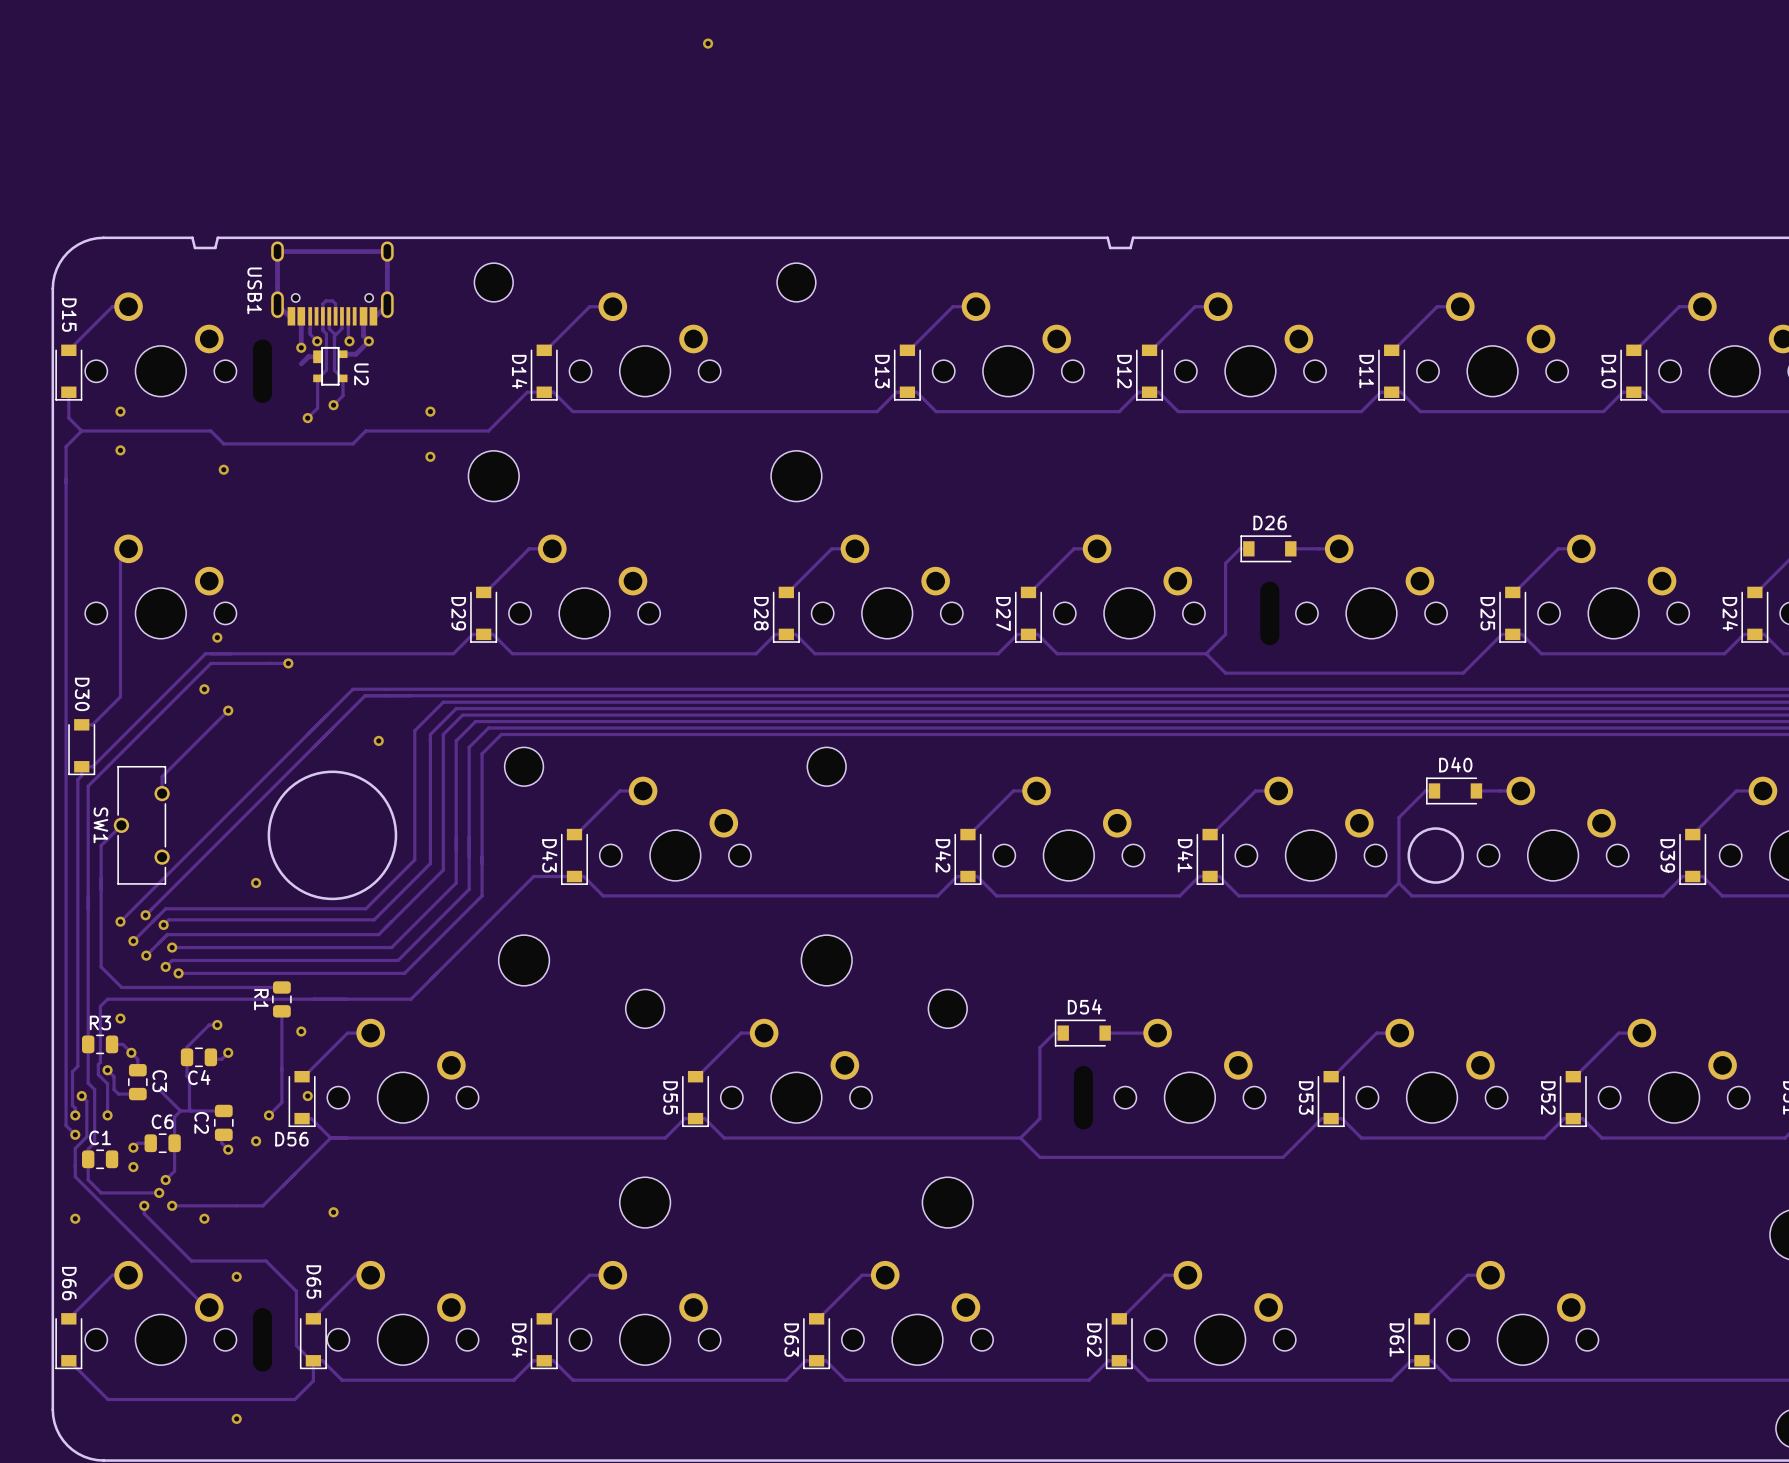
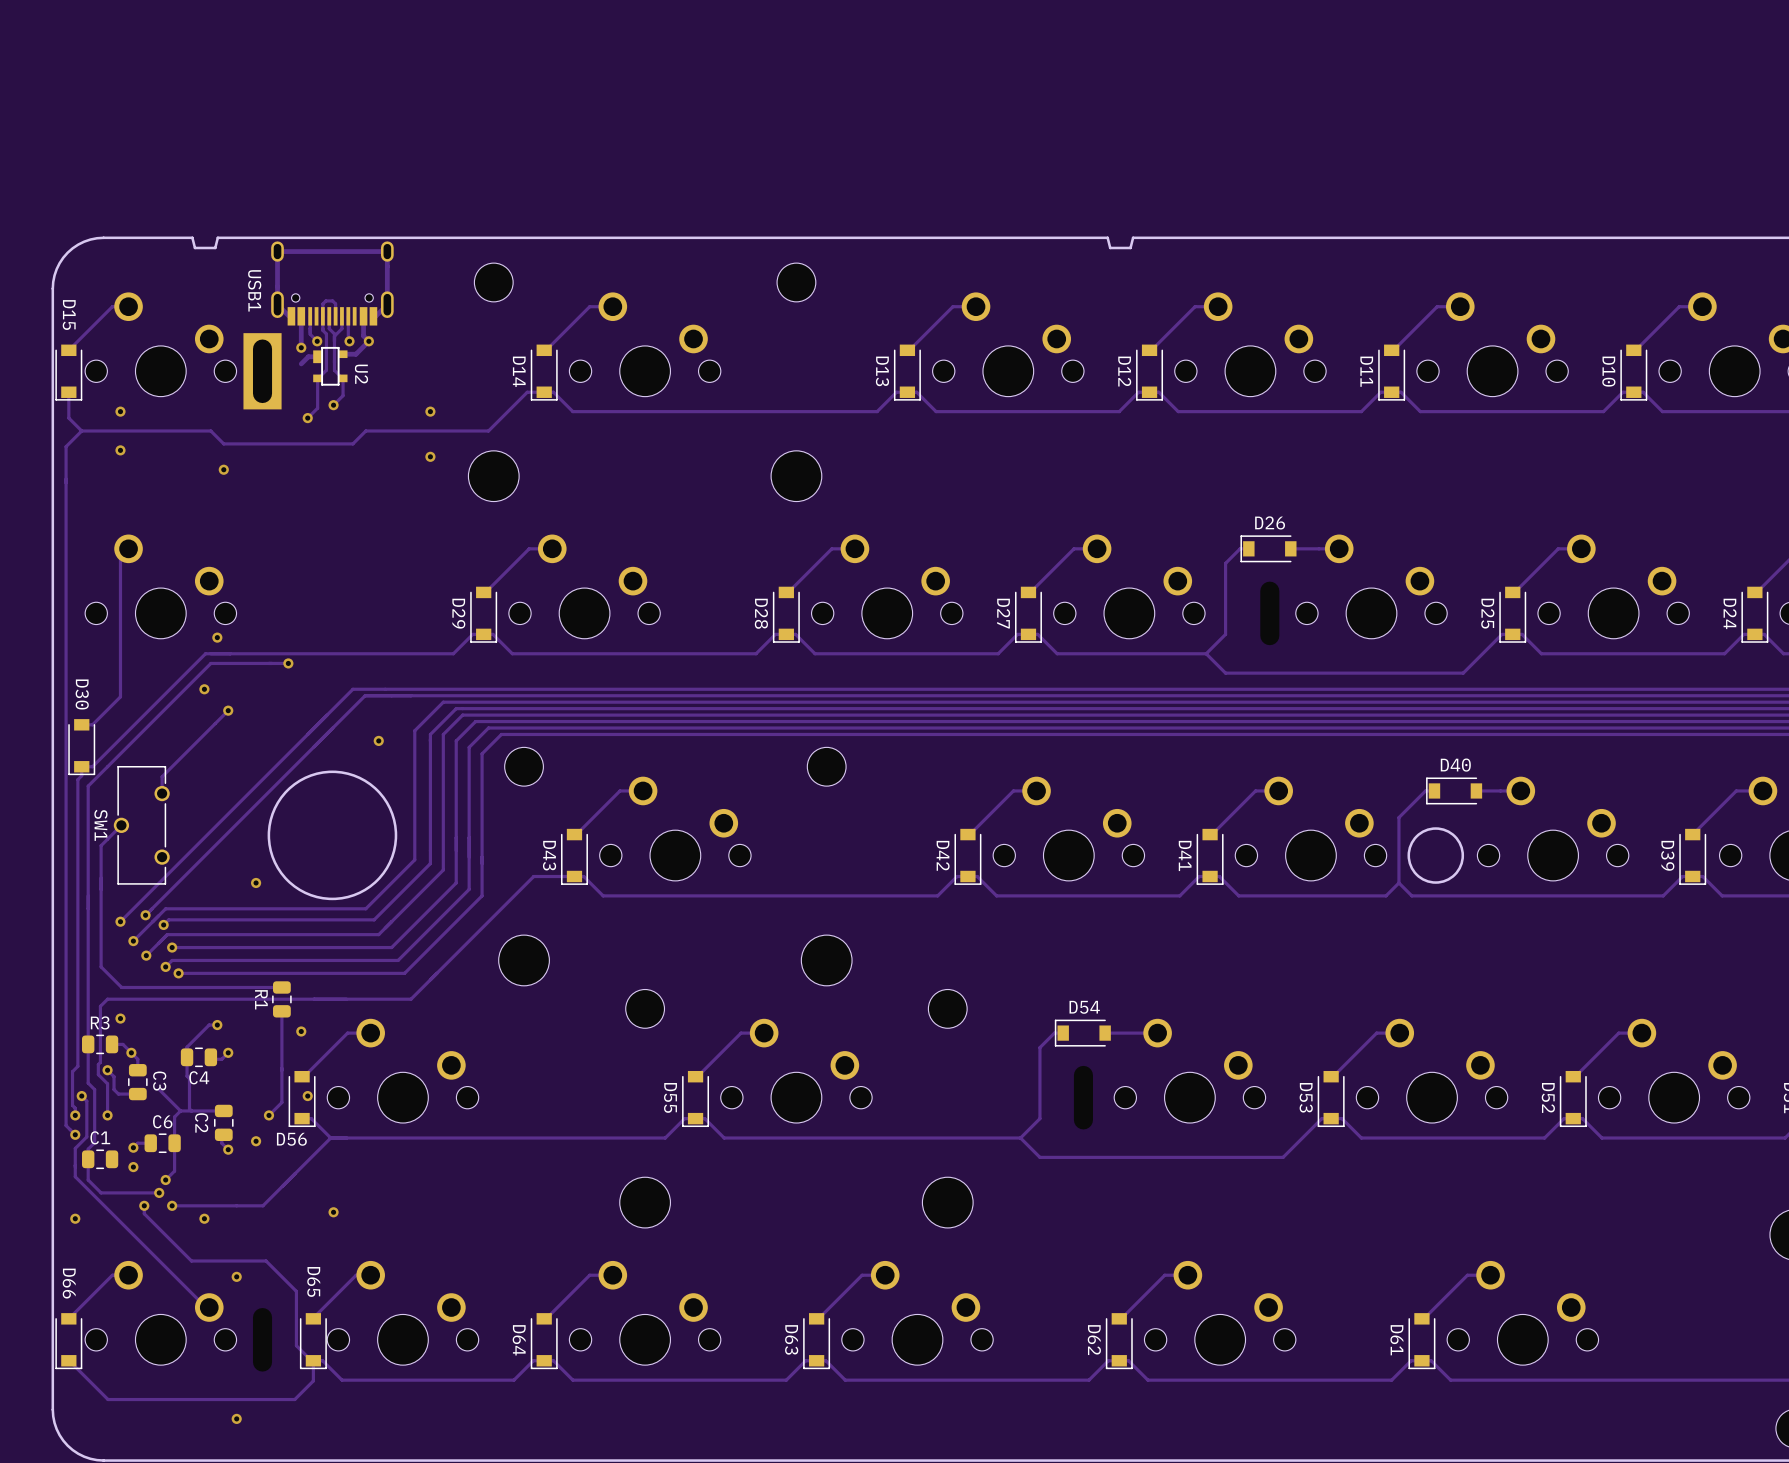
via: (708, 43) -> none
part footprint: [252, 339, 273, 404] -> [243, 333, 282, 410]

